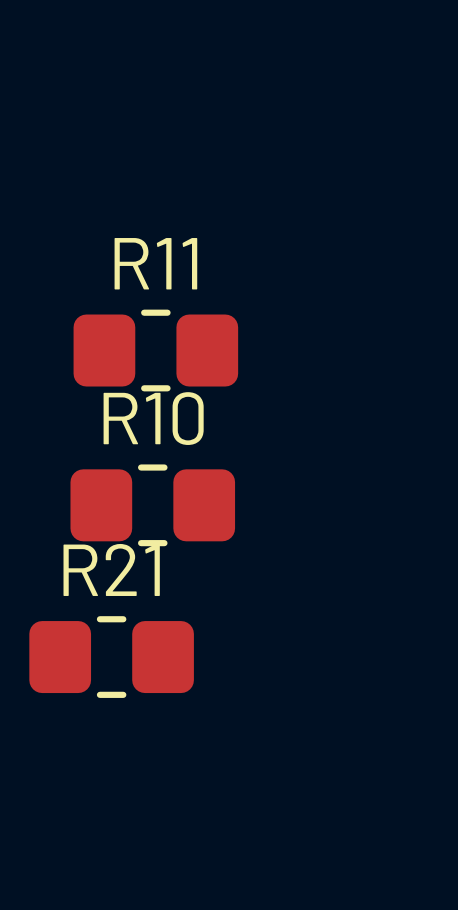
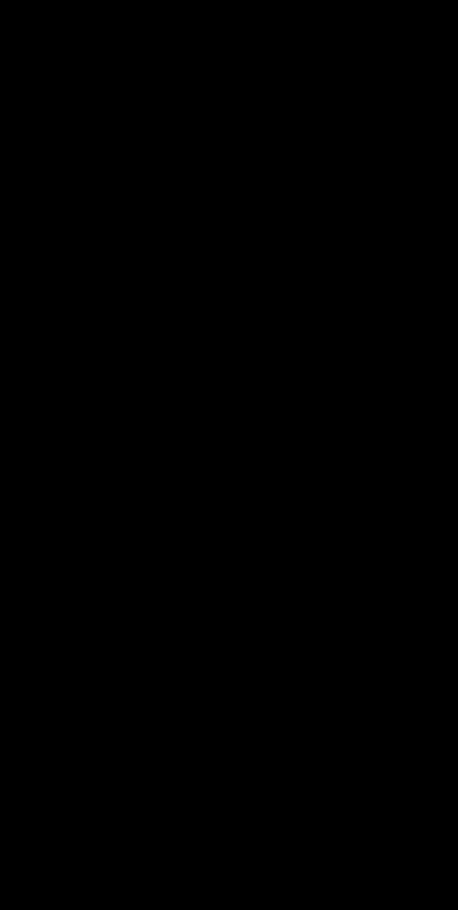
R11: (155, 350) -> none
R10: (152, 505) -> none
R21: (111, 657) -> none

